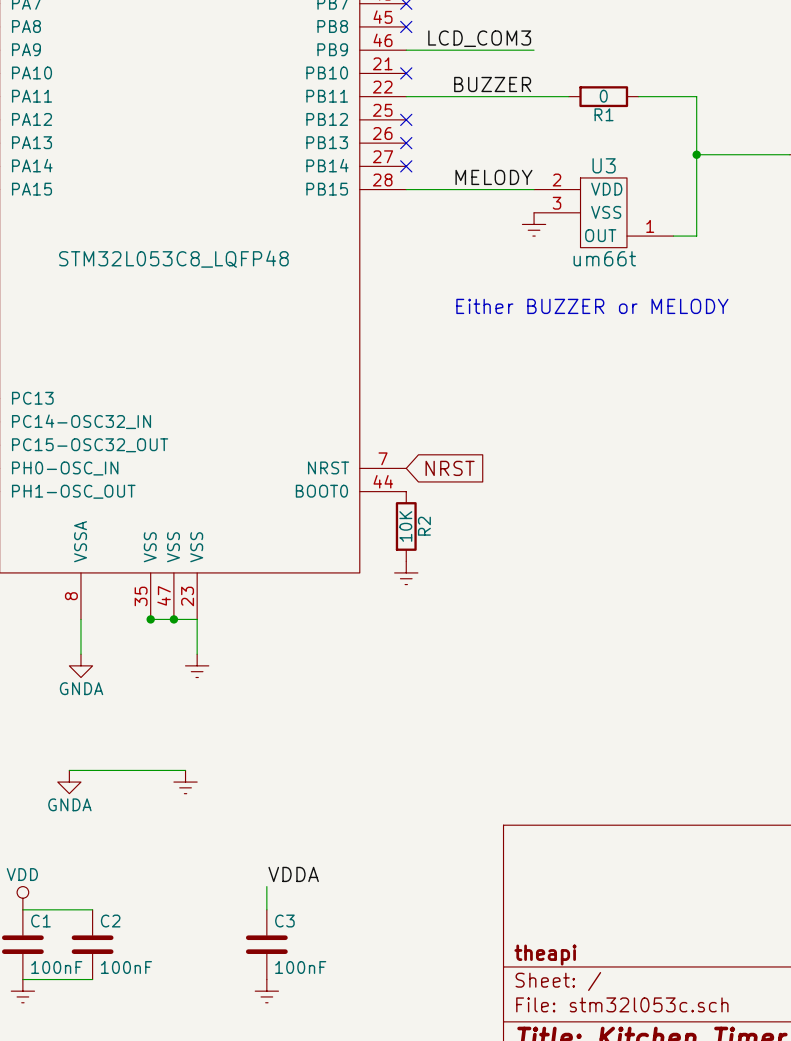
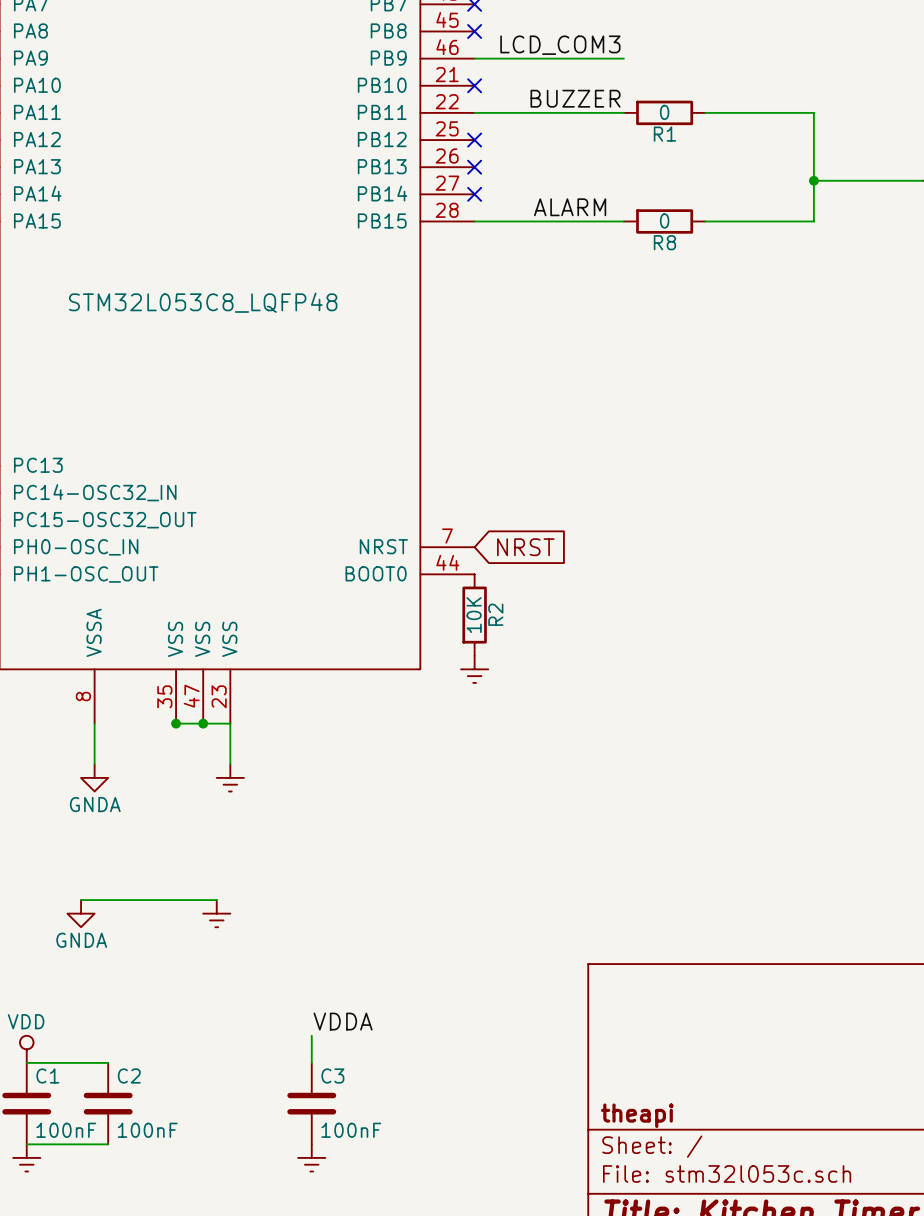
wire: (534, 96) (568, 96) -> (705, 112) (746, 112)
R1 position: (603, 96) -> (664, 112)
label: none -> ALARM (570, 207)
label: MELODY (493, 177) -> none
R8: none -> 0 (664, 221)
wire: (696, 189) (696, 236) (673, 236) -> (813, 221) (705, 221)
U3: um66t (603, 212) -> none
power symbol: (534, 224) -> none
text: Either BUZZER or MELODY (592, 306) -> none

